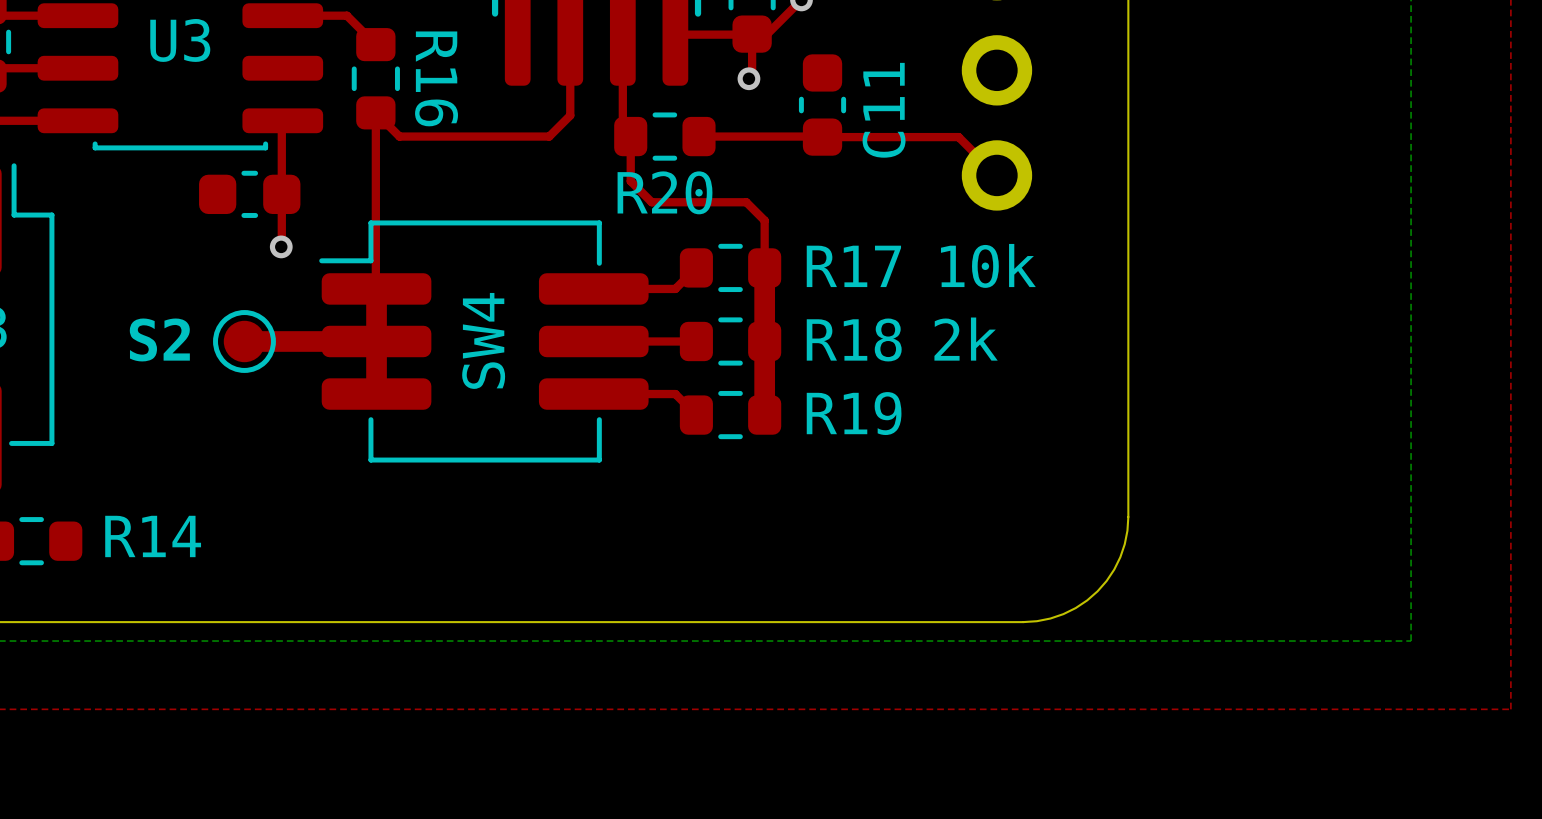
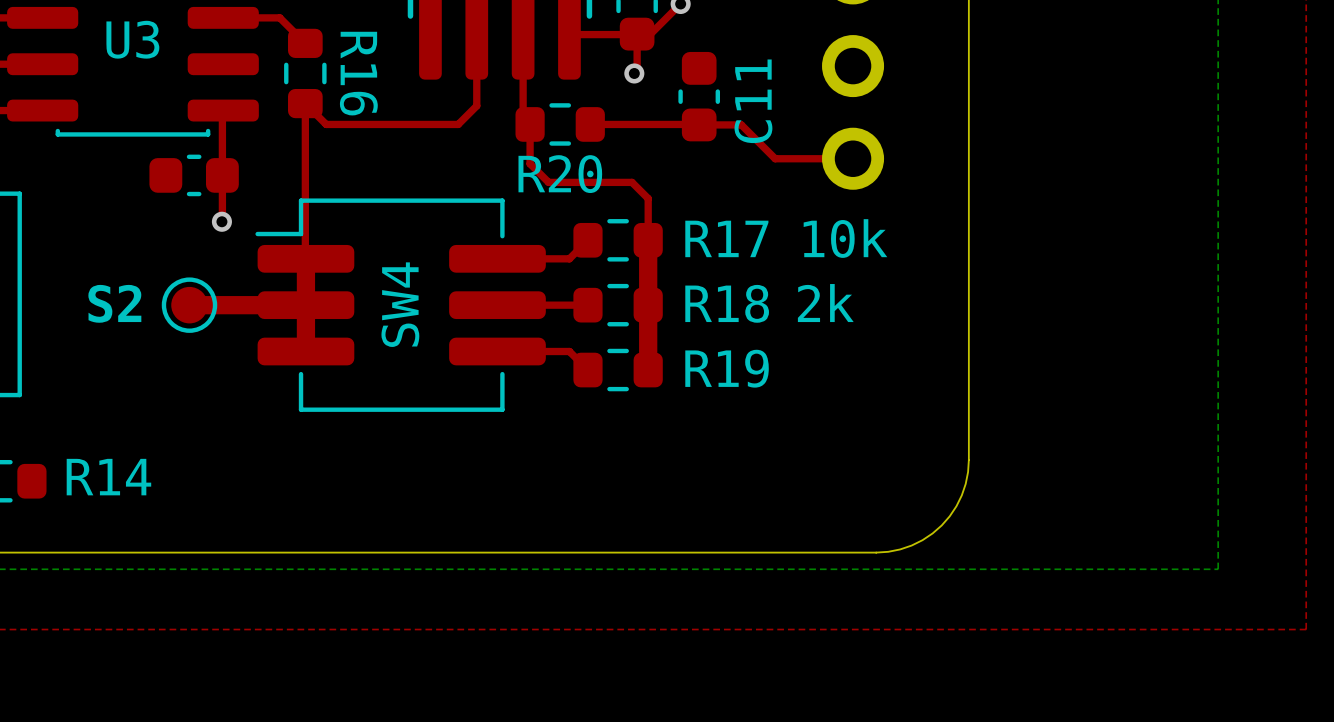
top track: (870, 137) (958, 137) (996, 175) -> (741, 124) (775, 158) (853, 158)

